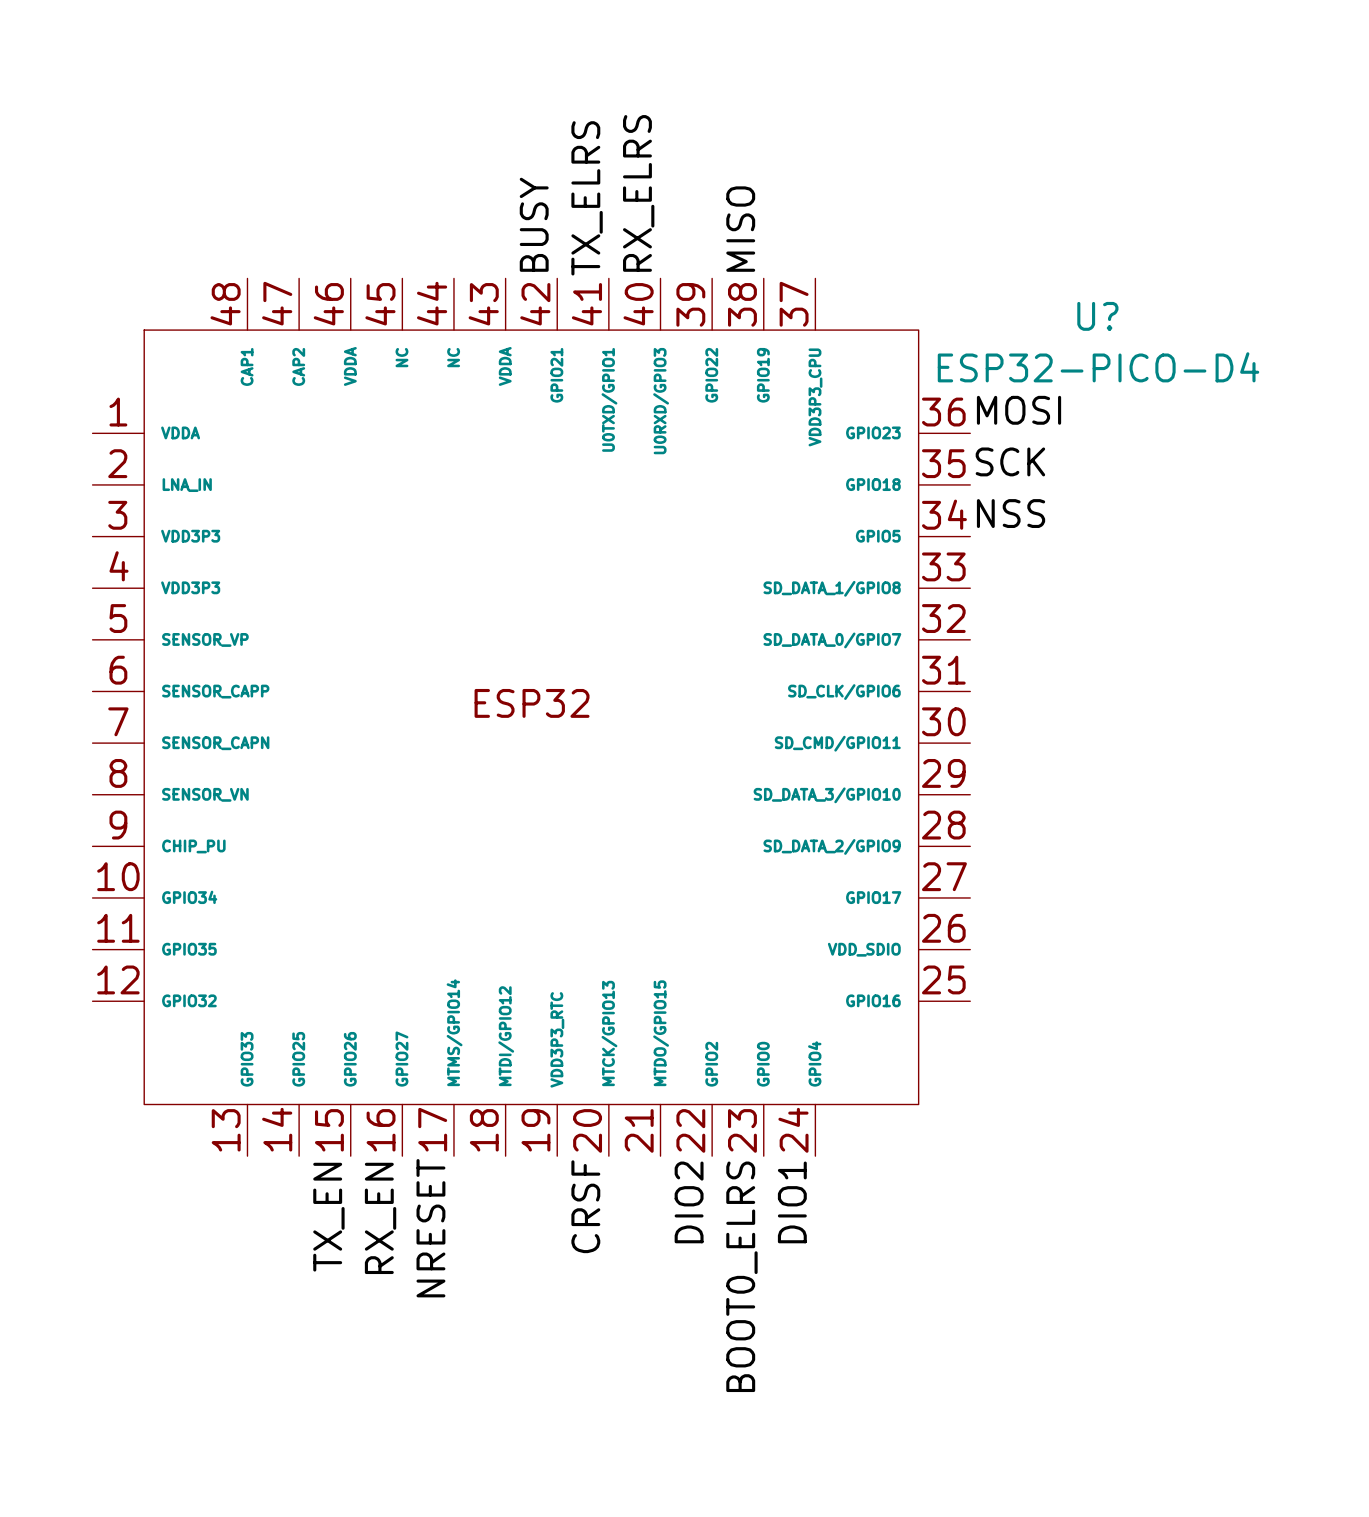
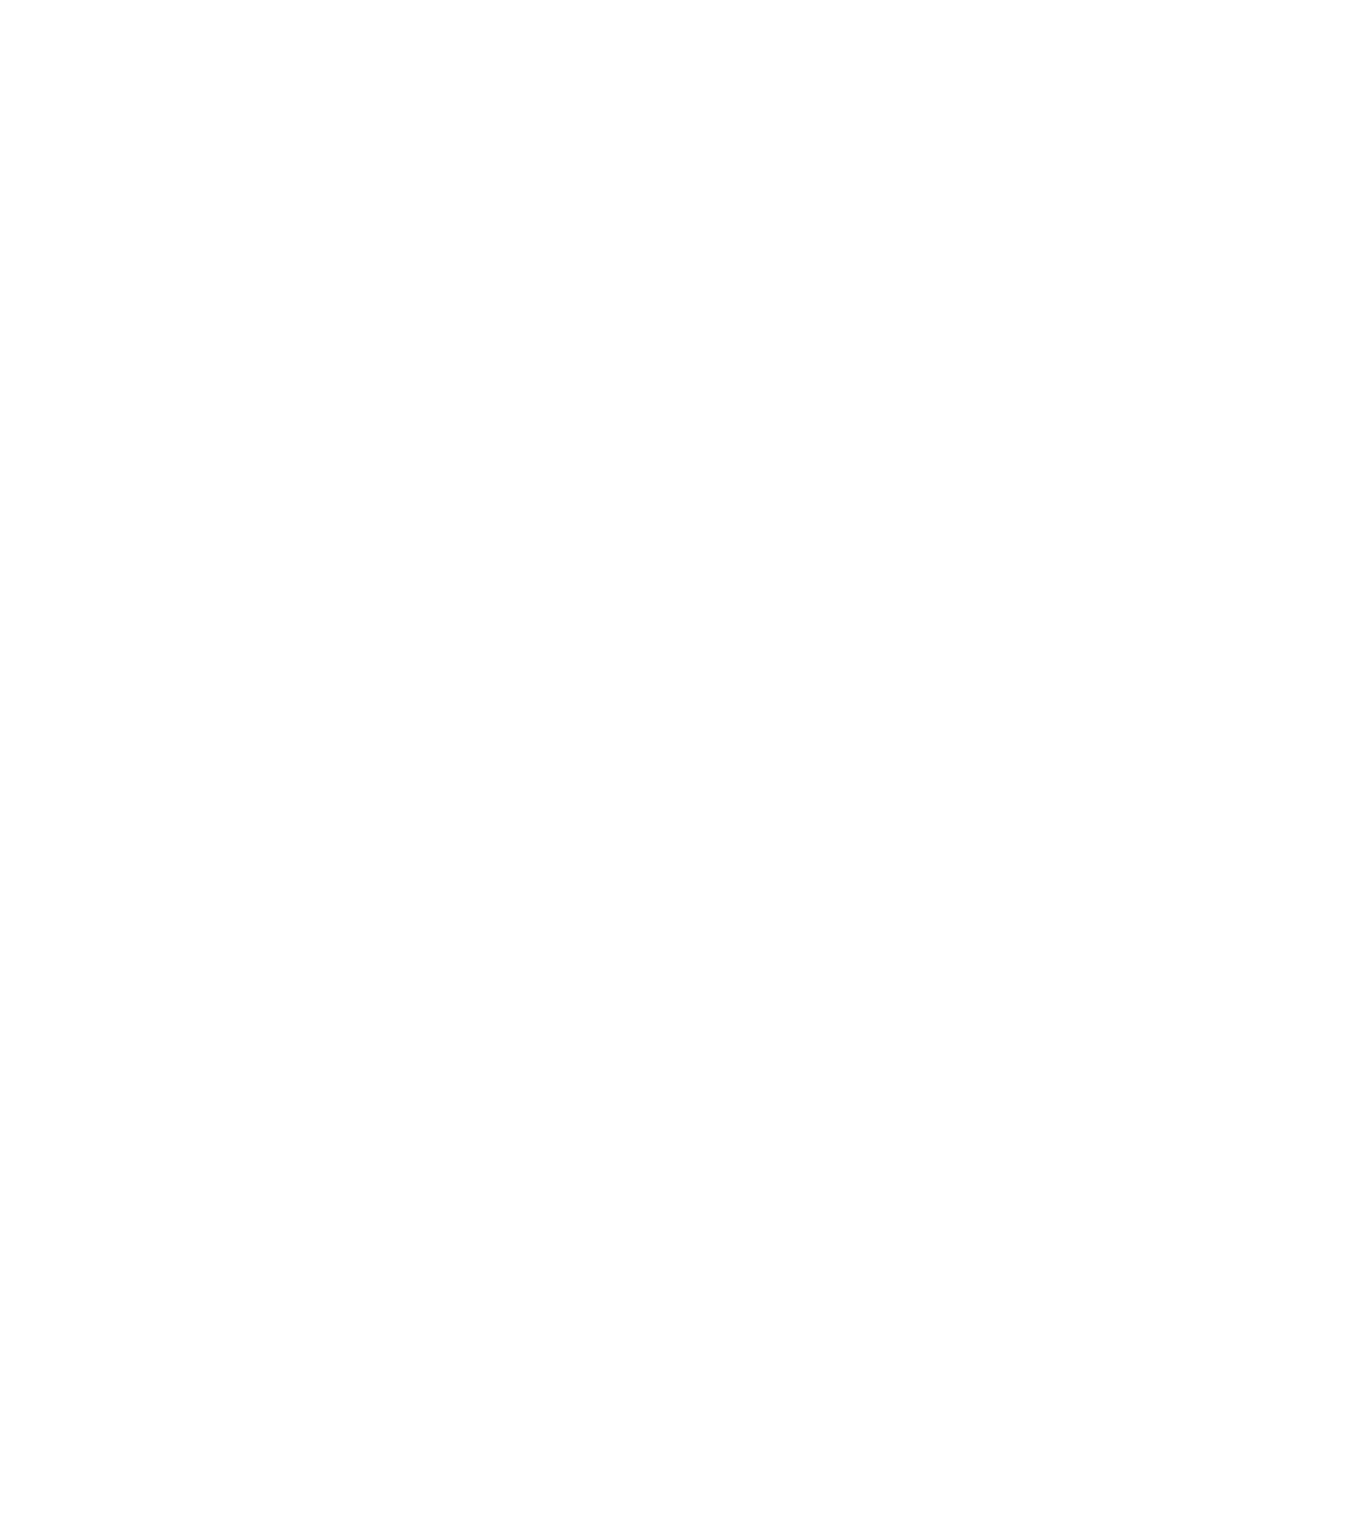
label: RX_ELRS (638, 193) -> none
label: TX_ELRS (587, 198) -> none
label: BUSY (534, 224) -> none
label: MISO (740, 229) -> none
label: MOSI (1019, 410) -> none
label: SCK (1010, 461) -> none
label: NSS (1011, 513) -> none
U?: ESP32-PICO-D4 (531, 717) -> none
label: DIO2 (689, 1202) -> none
label: DIO1 (792, 1202) -> none
label: CRSF (585, 1206) -> none
label: TX_EN (328, 1217) -> none
label: RX_EN (380, 1218) -> none
label: NRESET (430, 1228) -> none
label: BOOT0_ELRS (741, 1276) -> none

